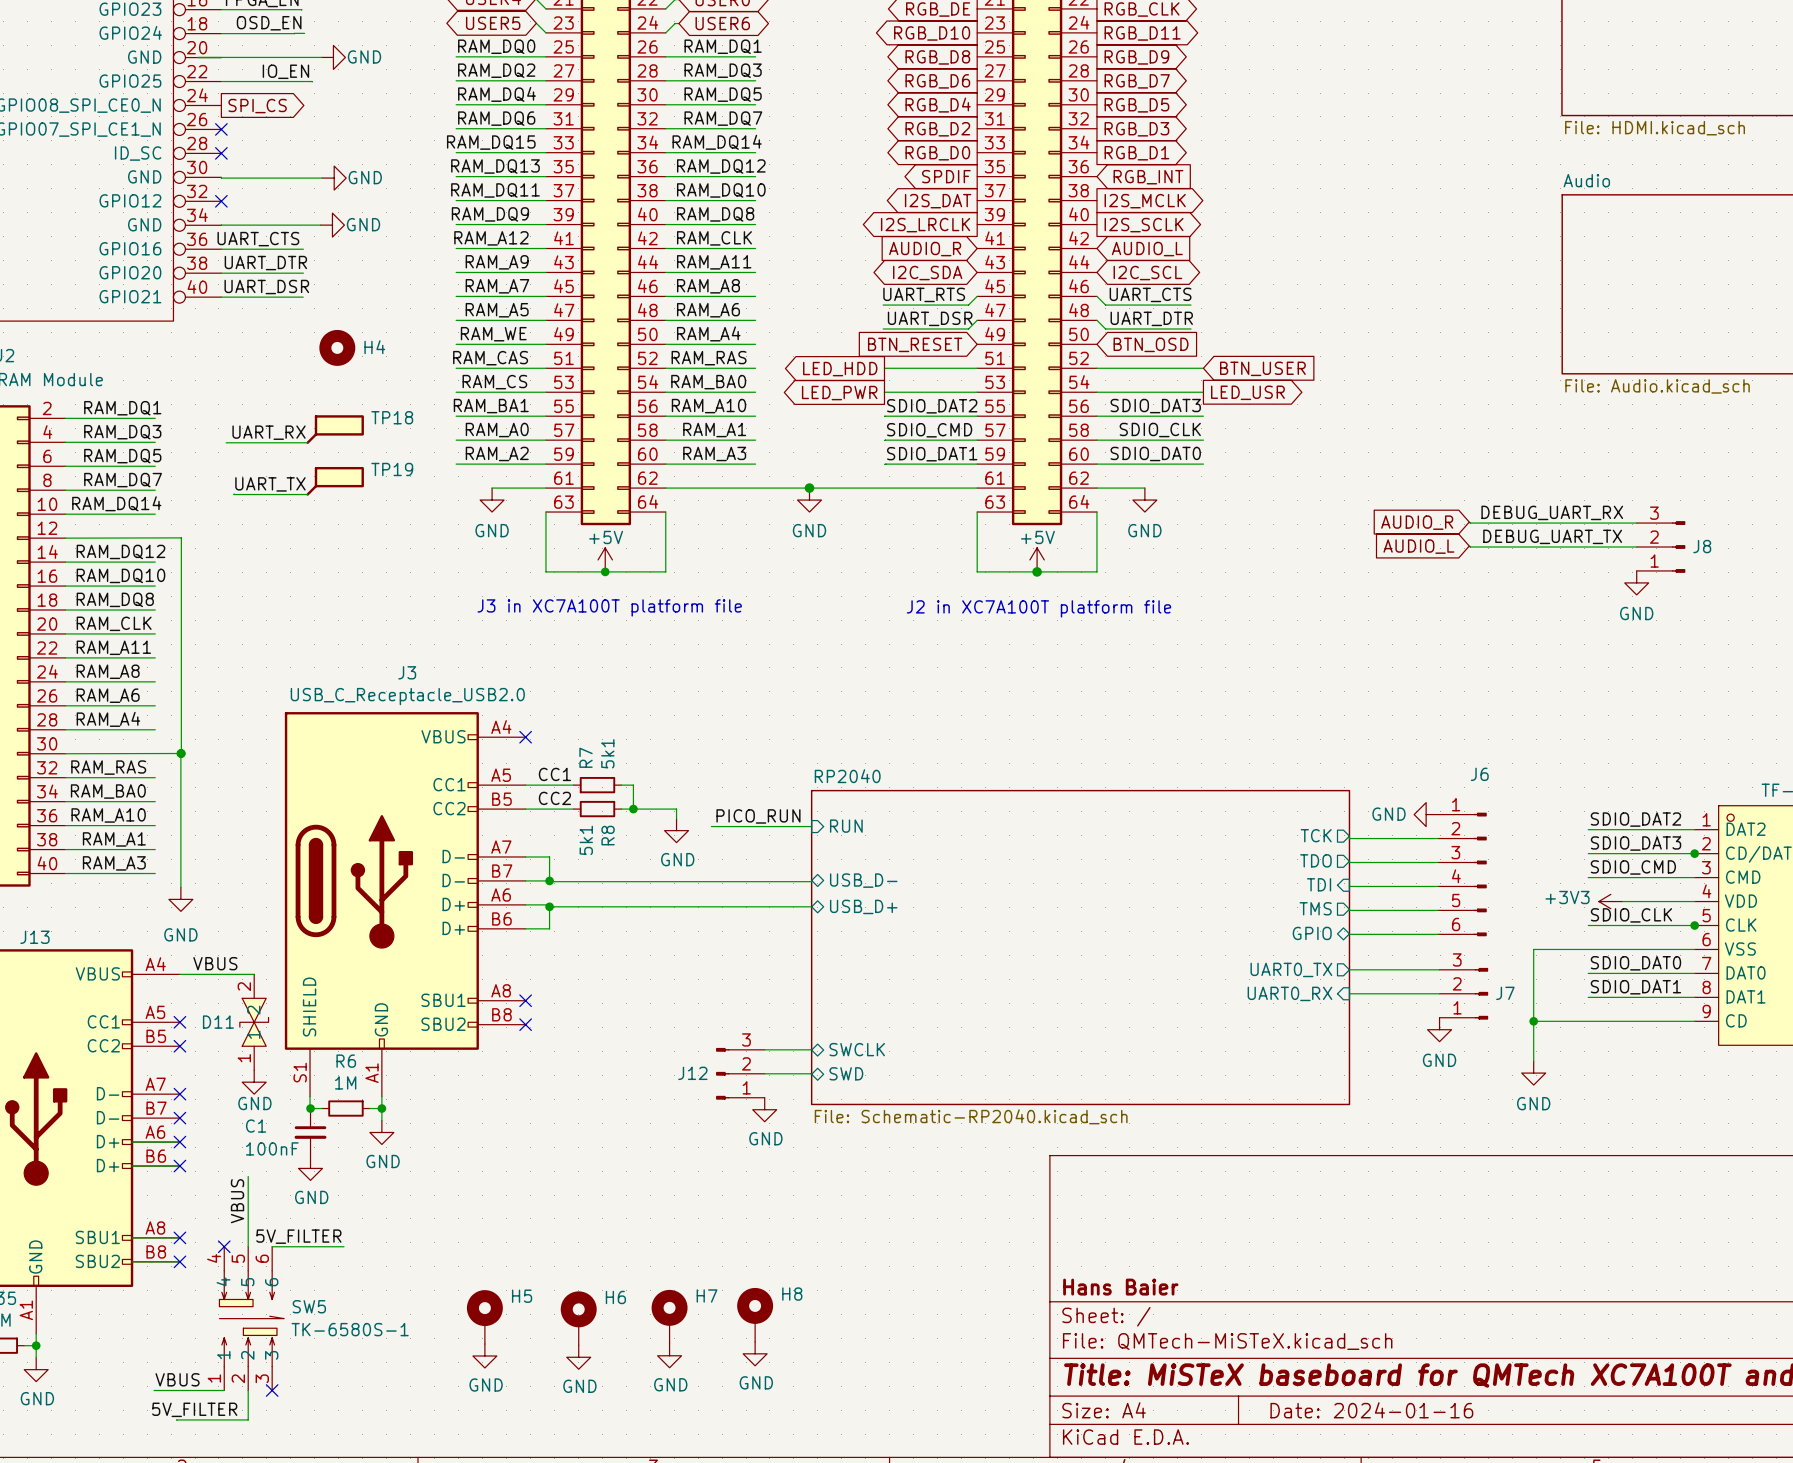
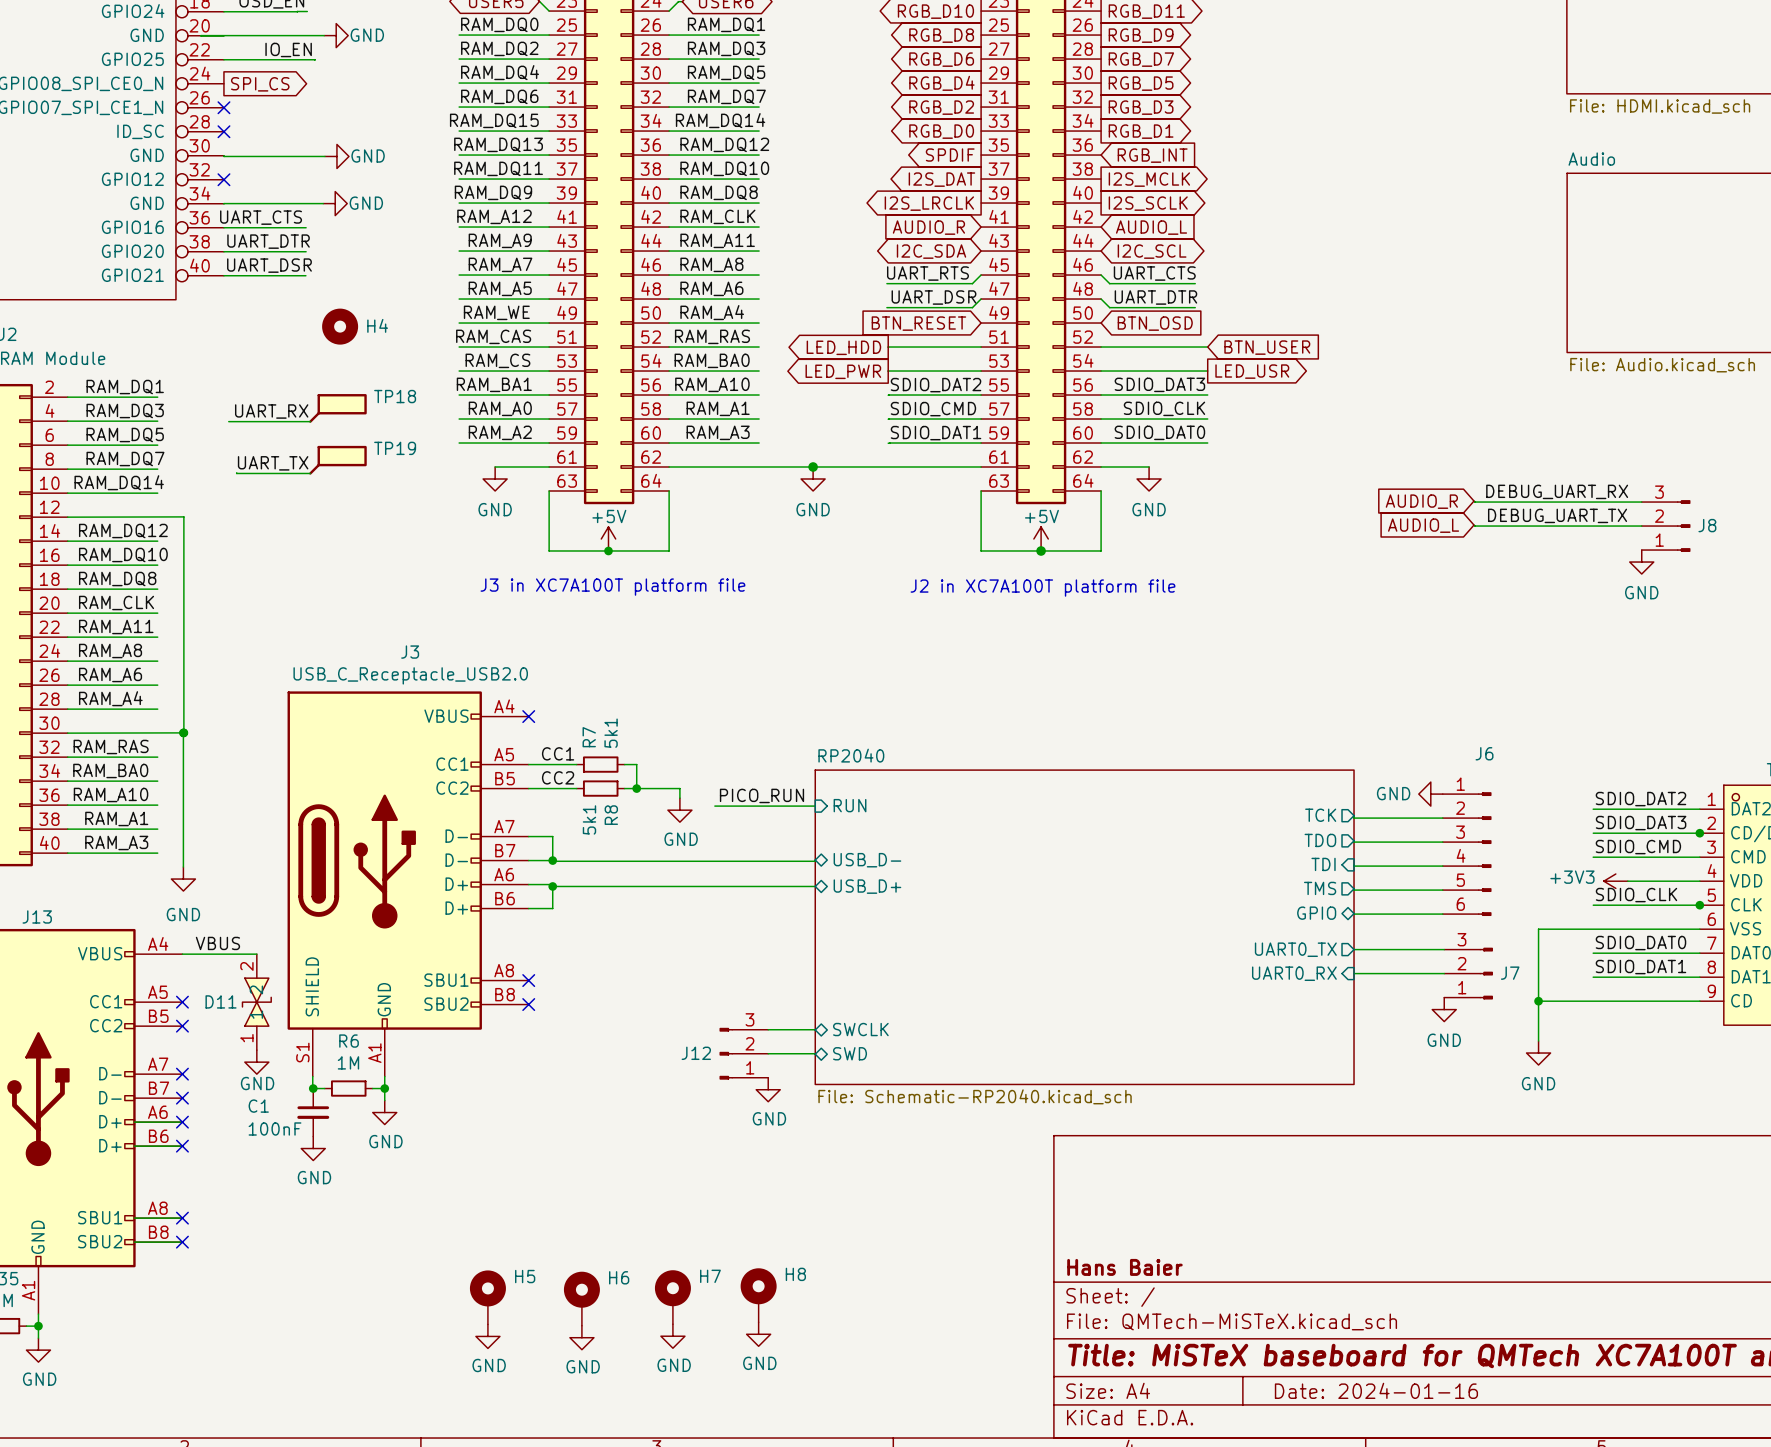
wire: (248, 1176) (248, 1246) -> none
label: VBUS (237, 1201) -> none
label: 5V_FILTER (298, 1236) -> none
no-connect mark: (224, 1246) -> none
wire: (272, 1246) (344, 1246) -> none
SW5: TK-6580S-1 (251, 1318) -> none
label: VBUS (177, 1379) -> none
wire: (154, 1390) (224, 1390) -> none
wire: (248, 1390) (248, 1419) (176, 1419) -> none
no-connect mark: (272, 1390) -> none
label: 5V_FILTER (194, 1409) -> none

